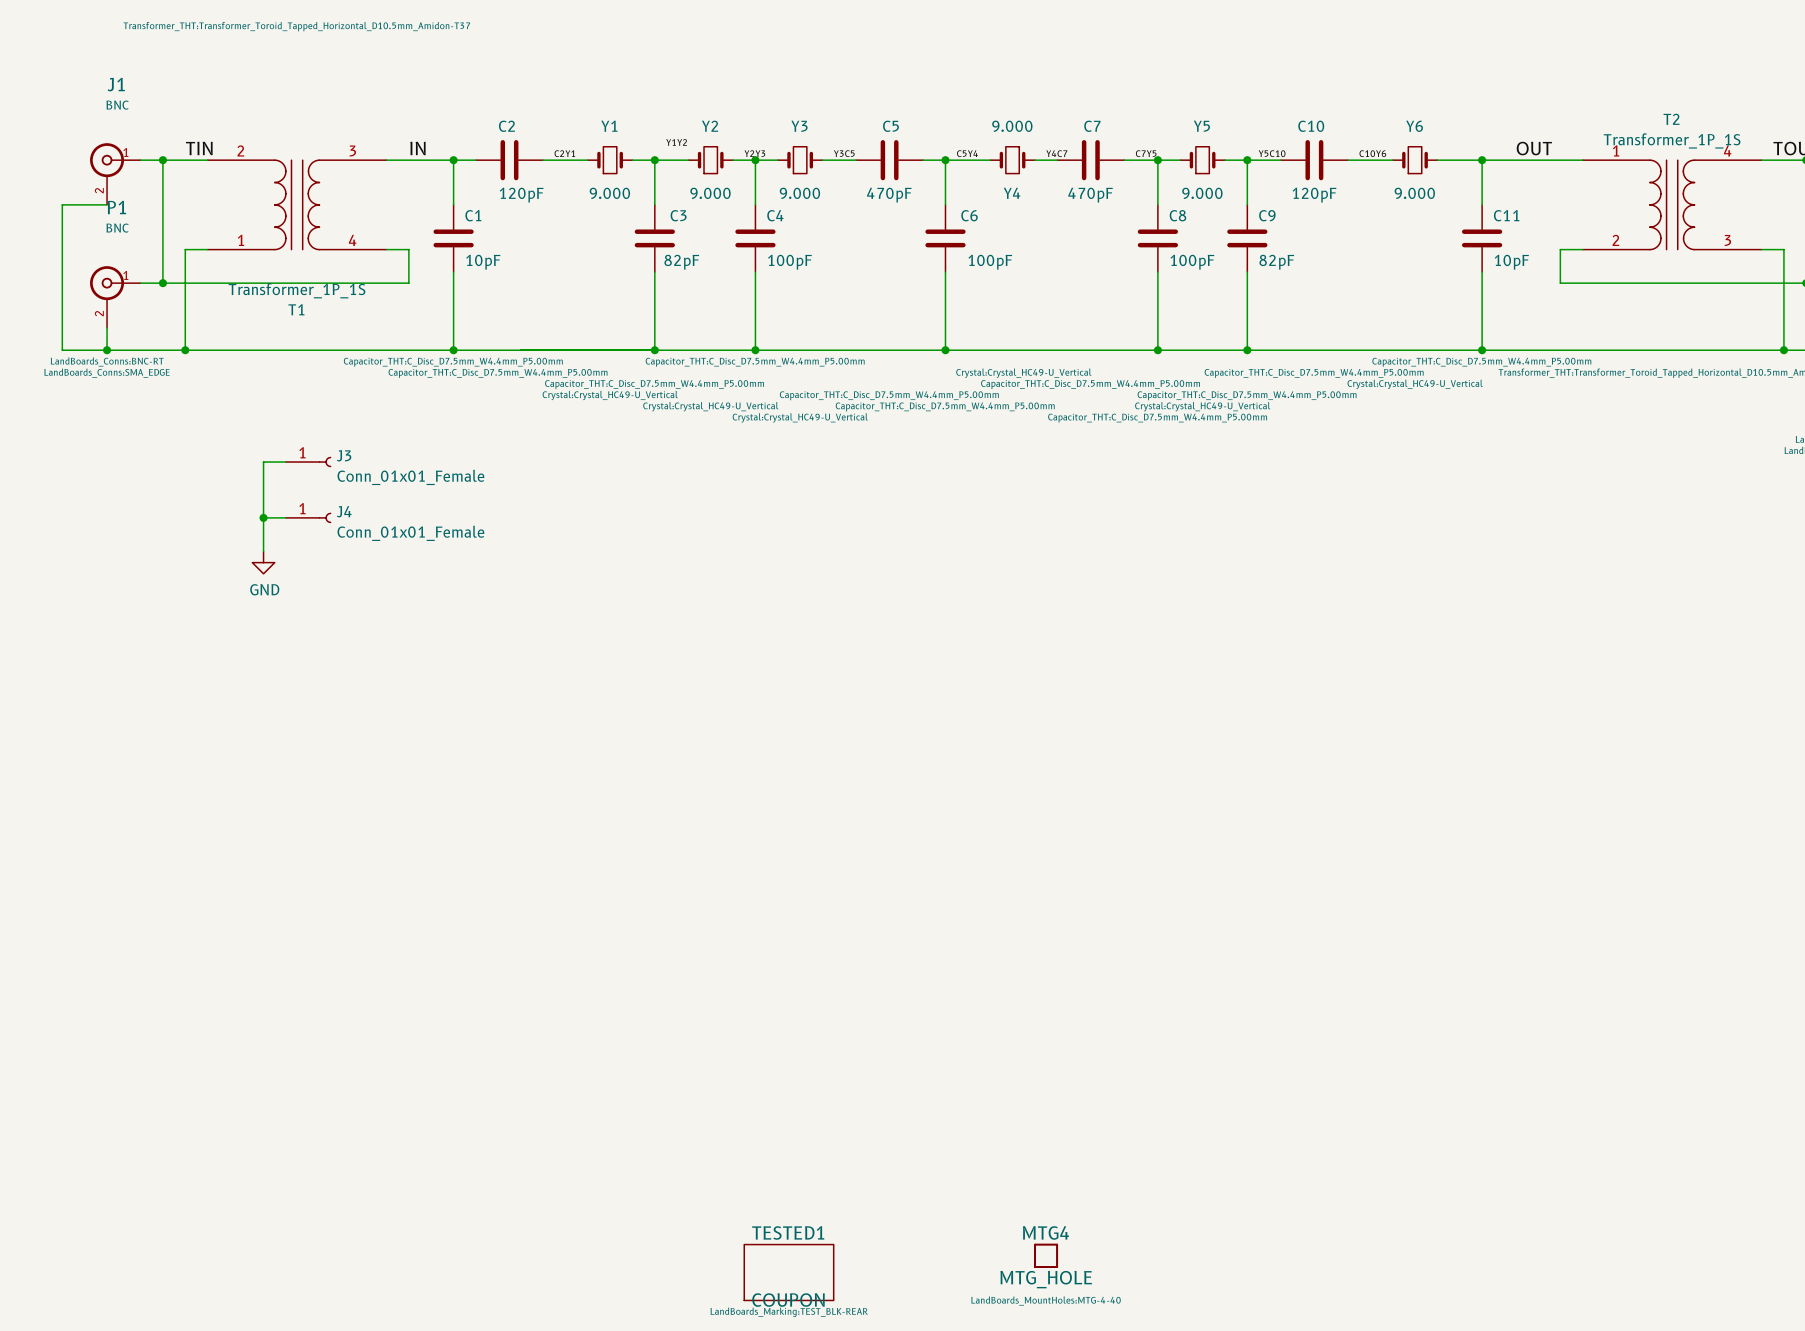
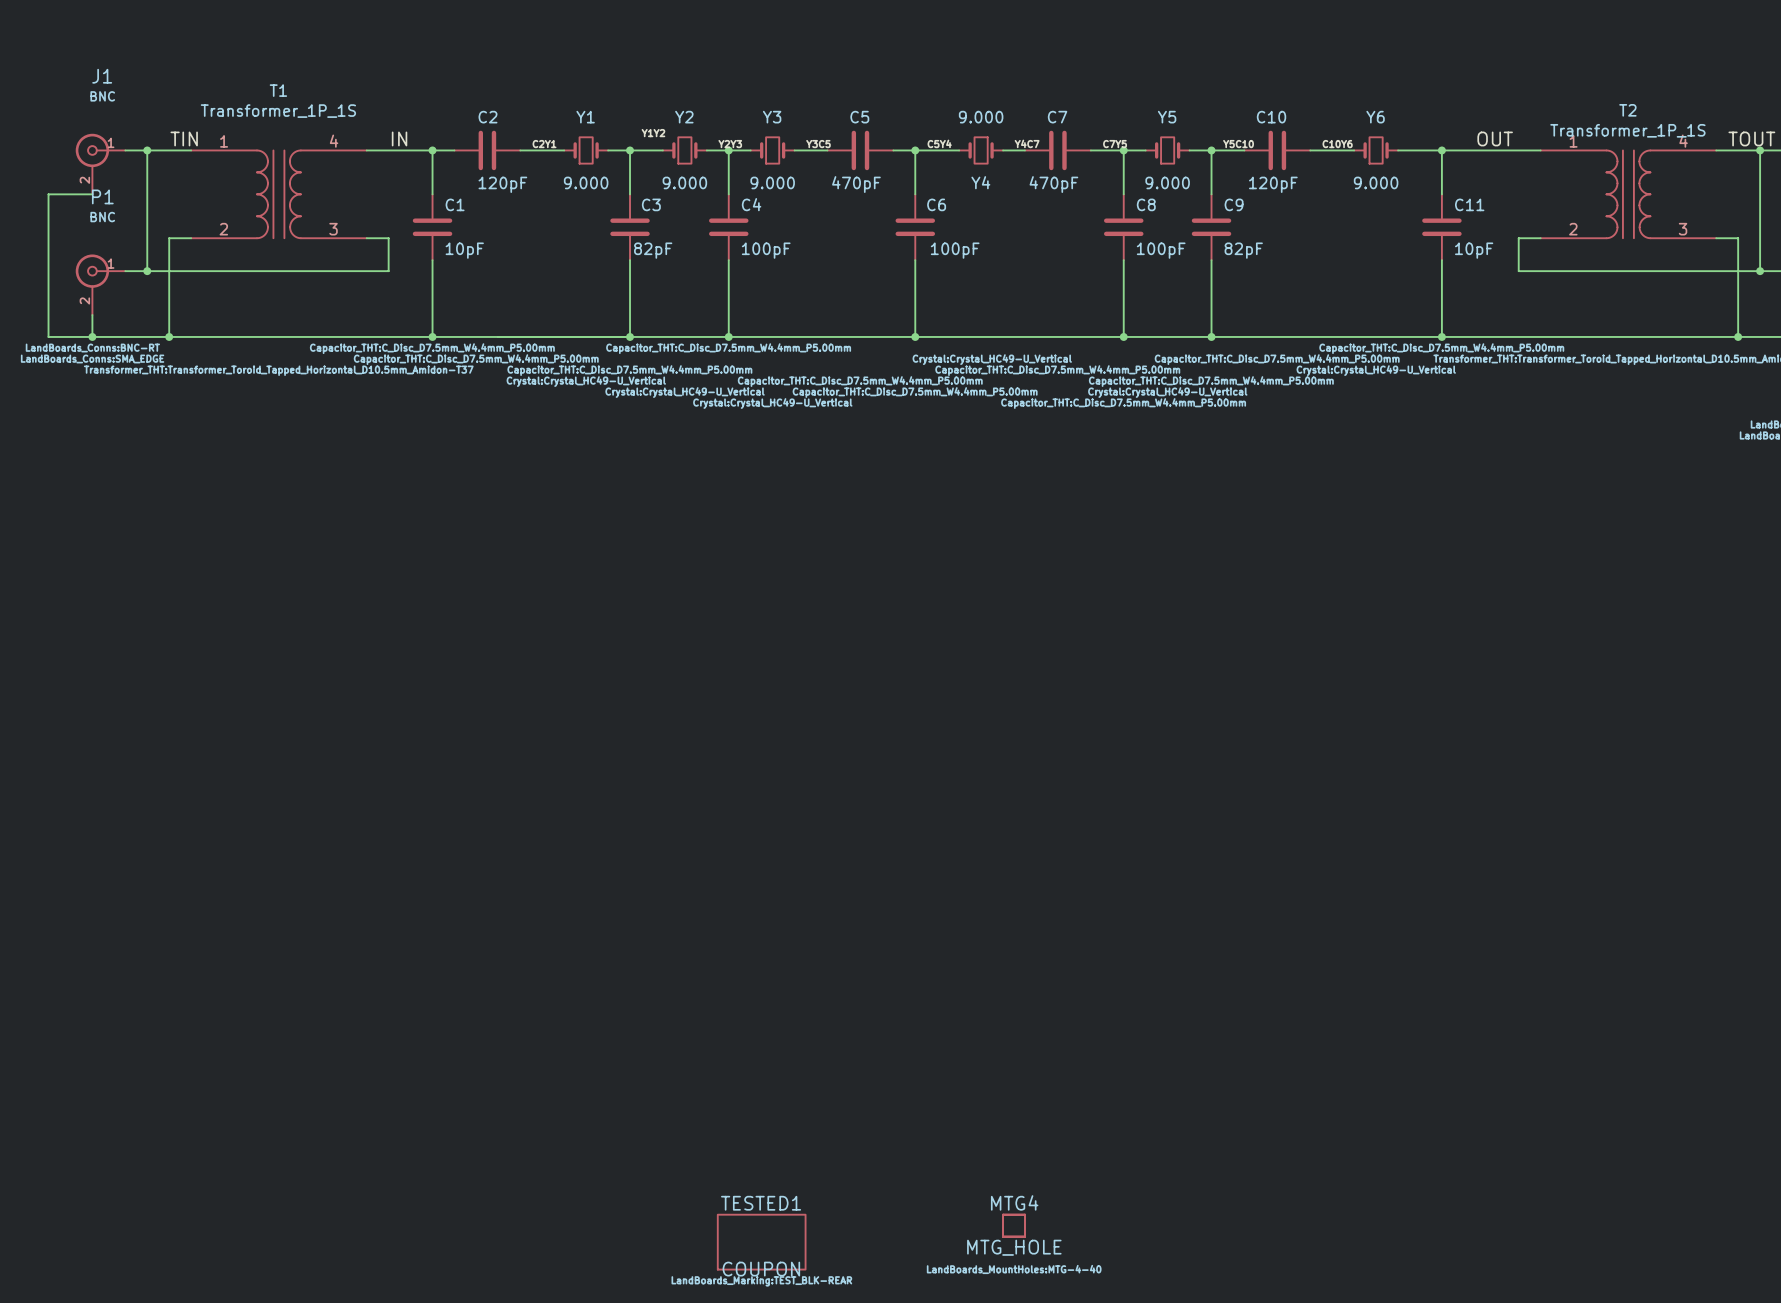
T1 flip: as is (297, 204) -> up-down (278, 194)
wire: (285, 462) (263, 462) (263, 551) -> none
J3: Conn_01x01_Female (308, 462) -> none
wire: (263, 517) (285, 517) -> none
junction: (263, 517) -> none
J4: Conn_01x01_Female (308, 517) -> none
power symbol: GND (263, 562) -> none

